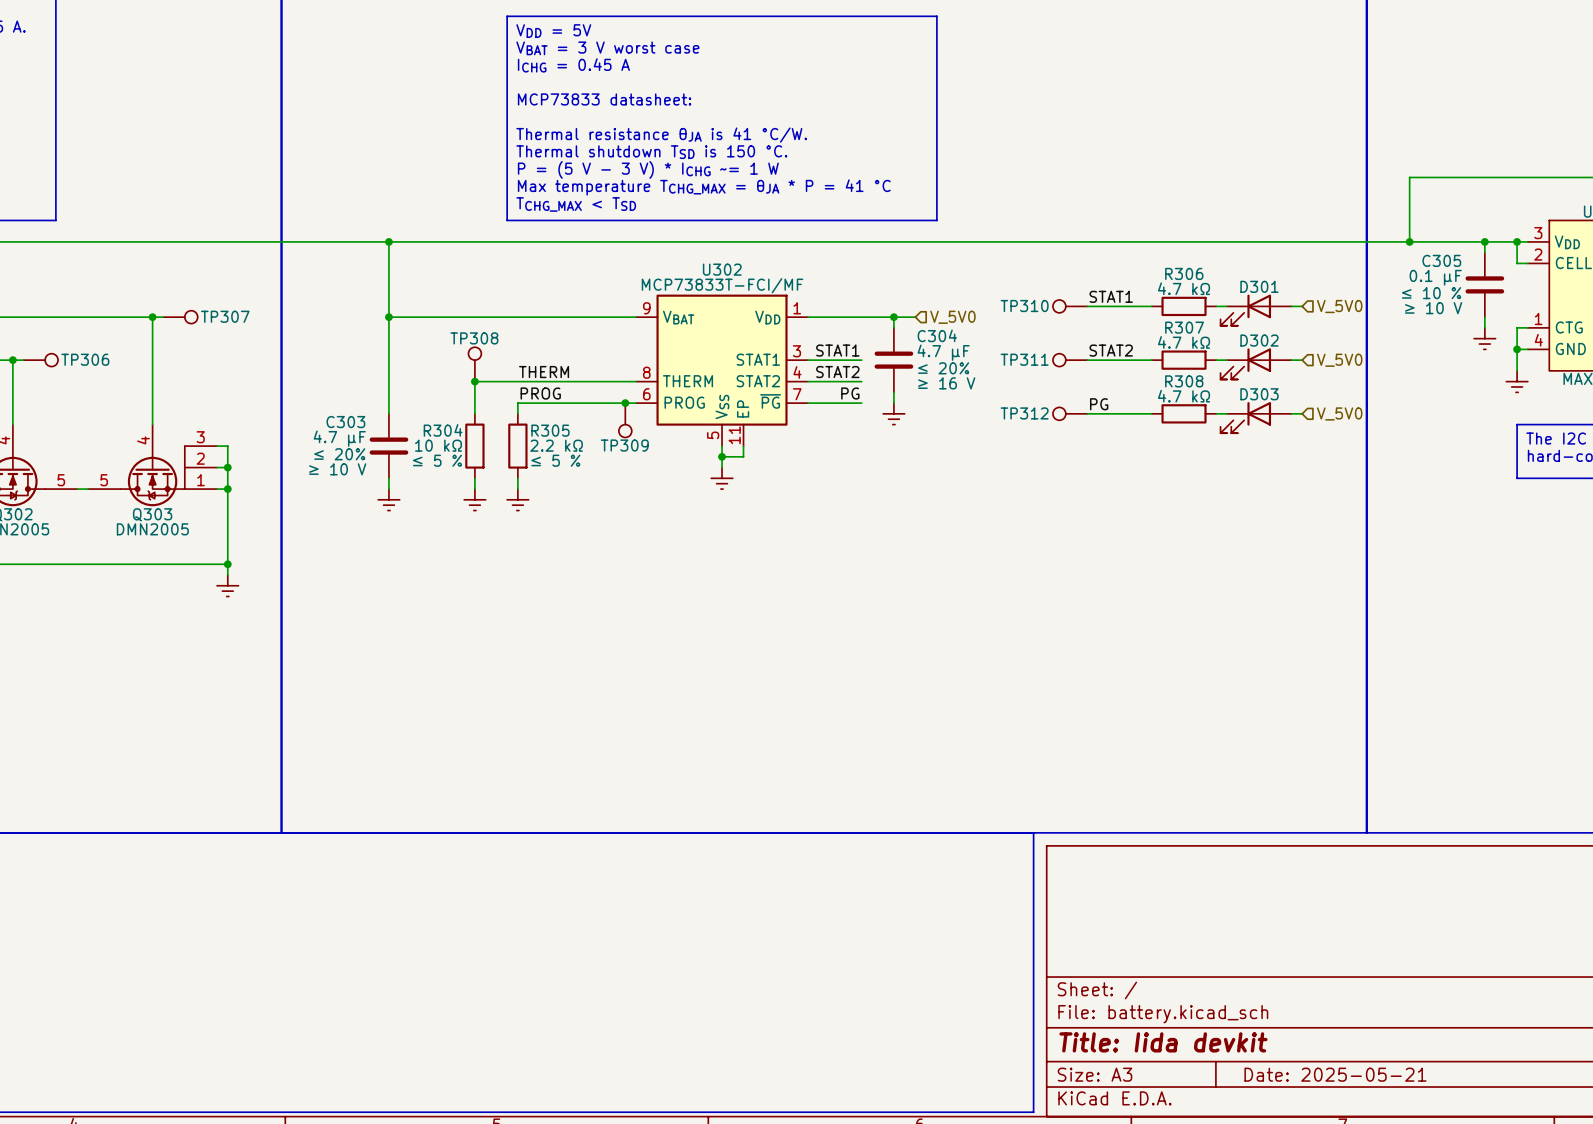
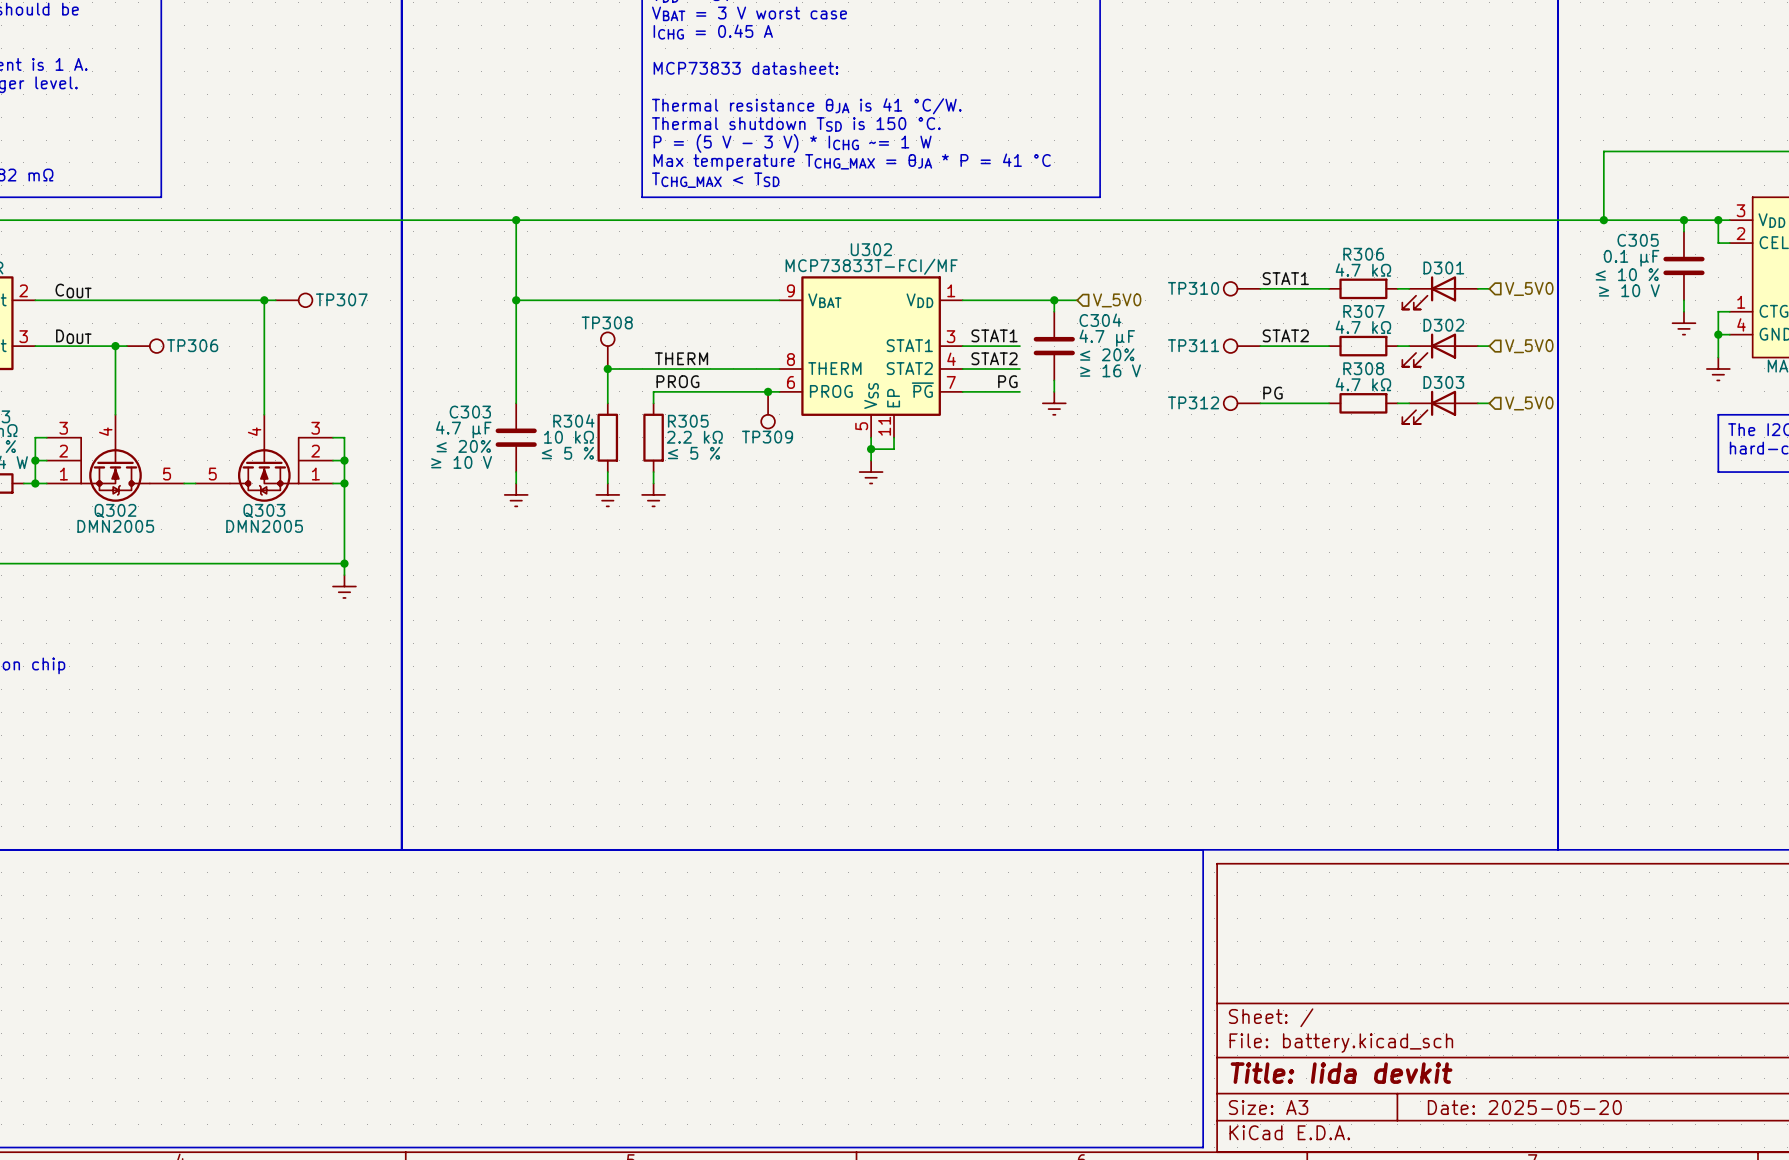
title block: Date: 2025-05-21 (1335, 1074) -> Date: 2025-05-20 (1524, 1107)

